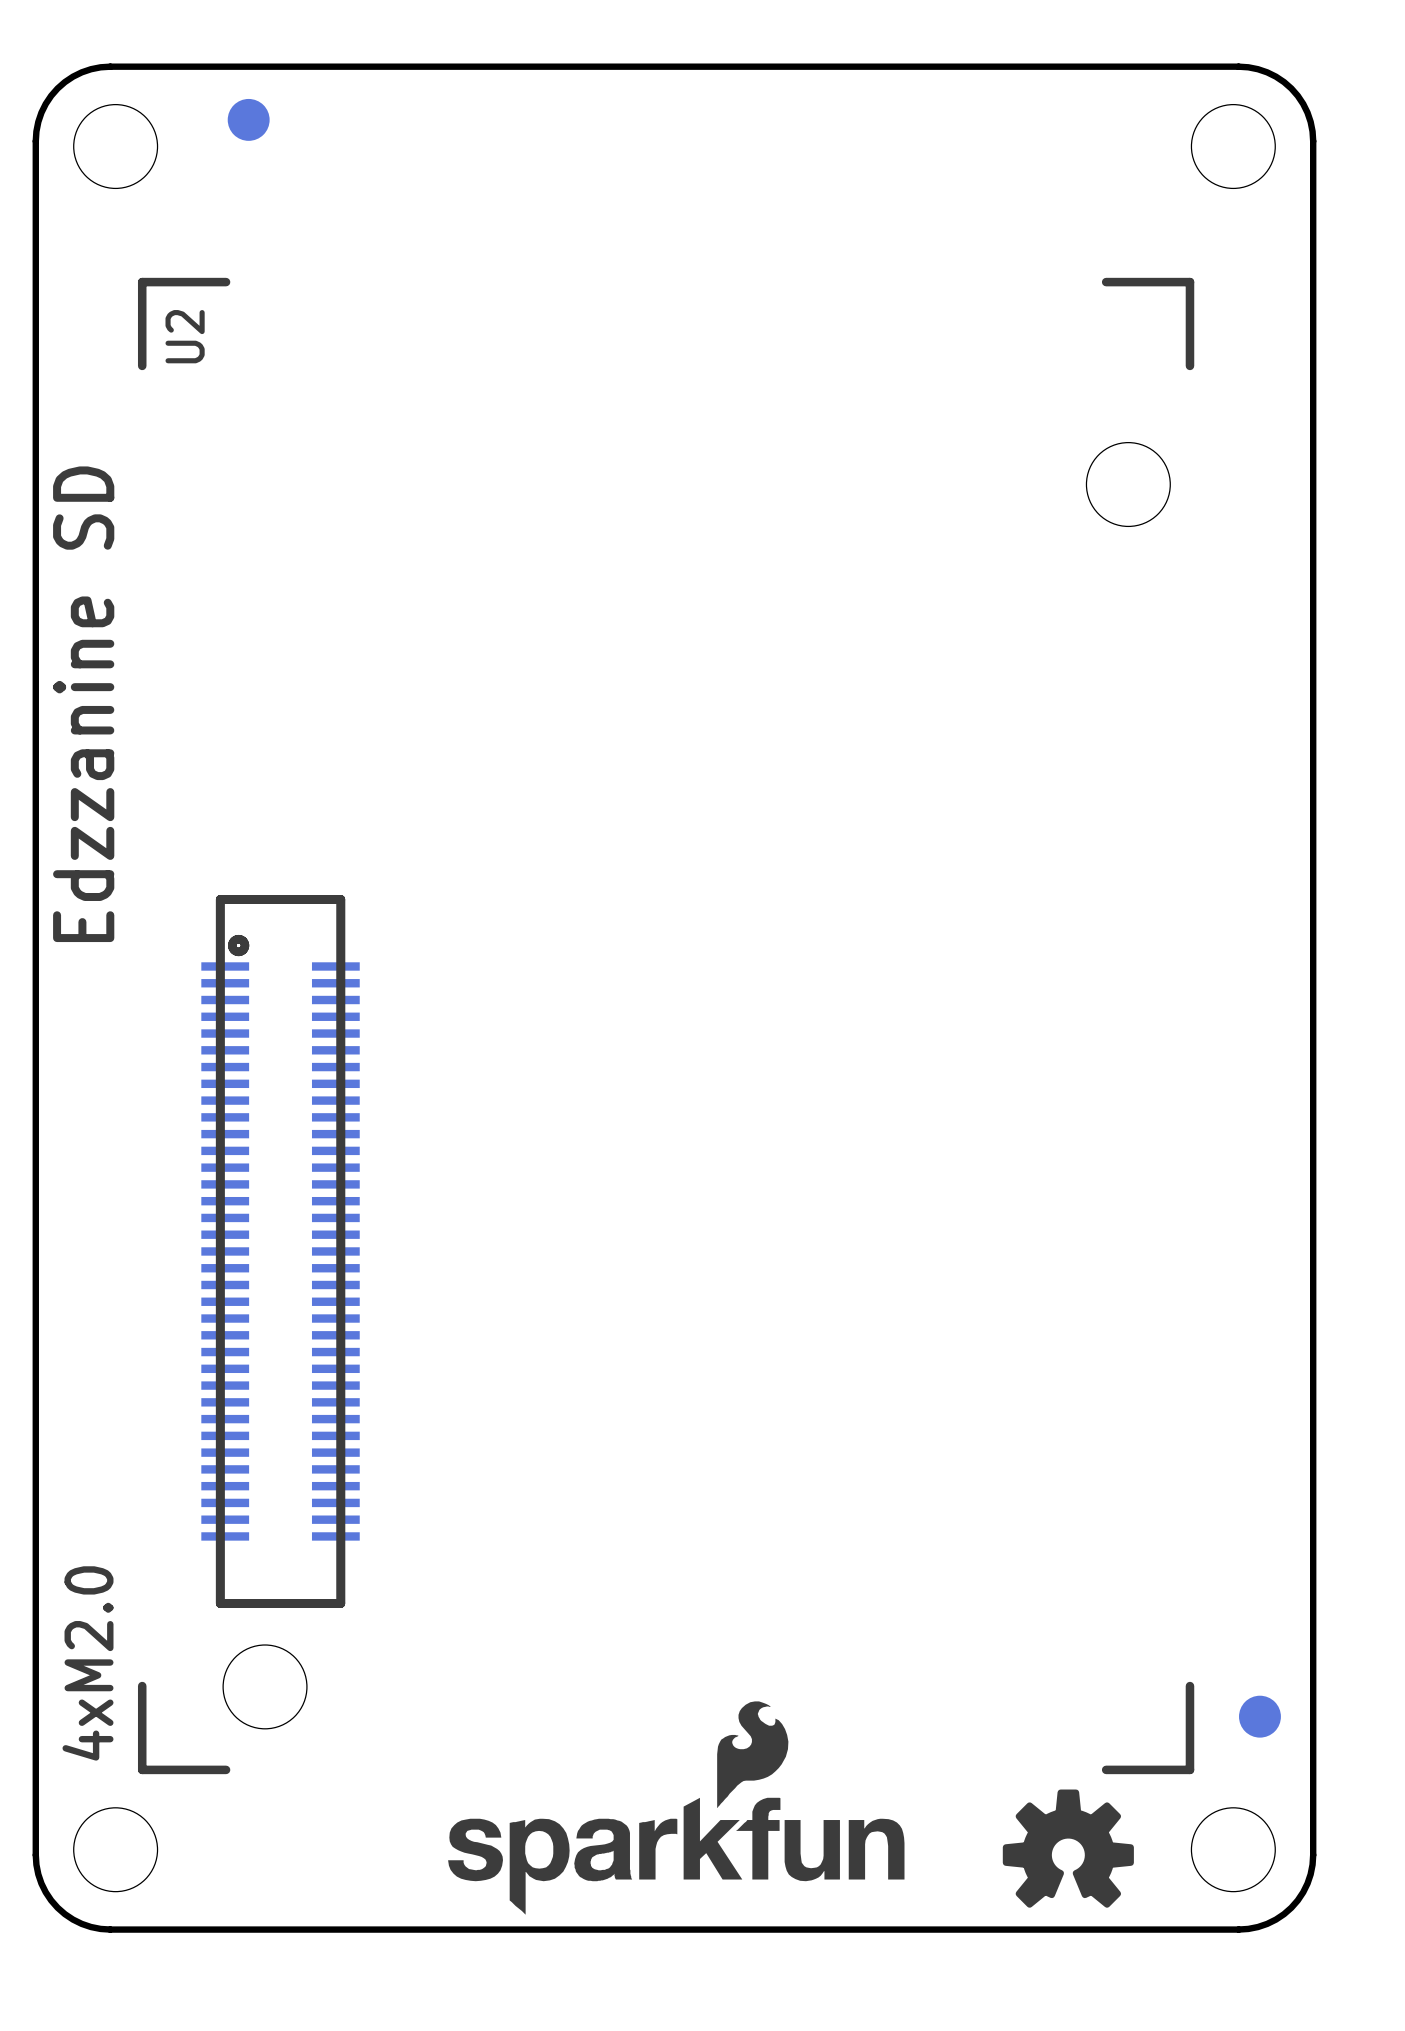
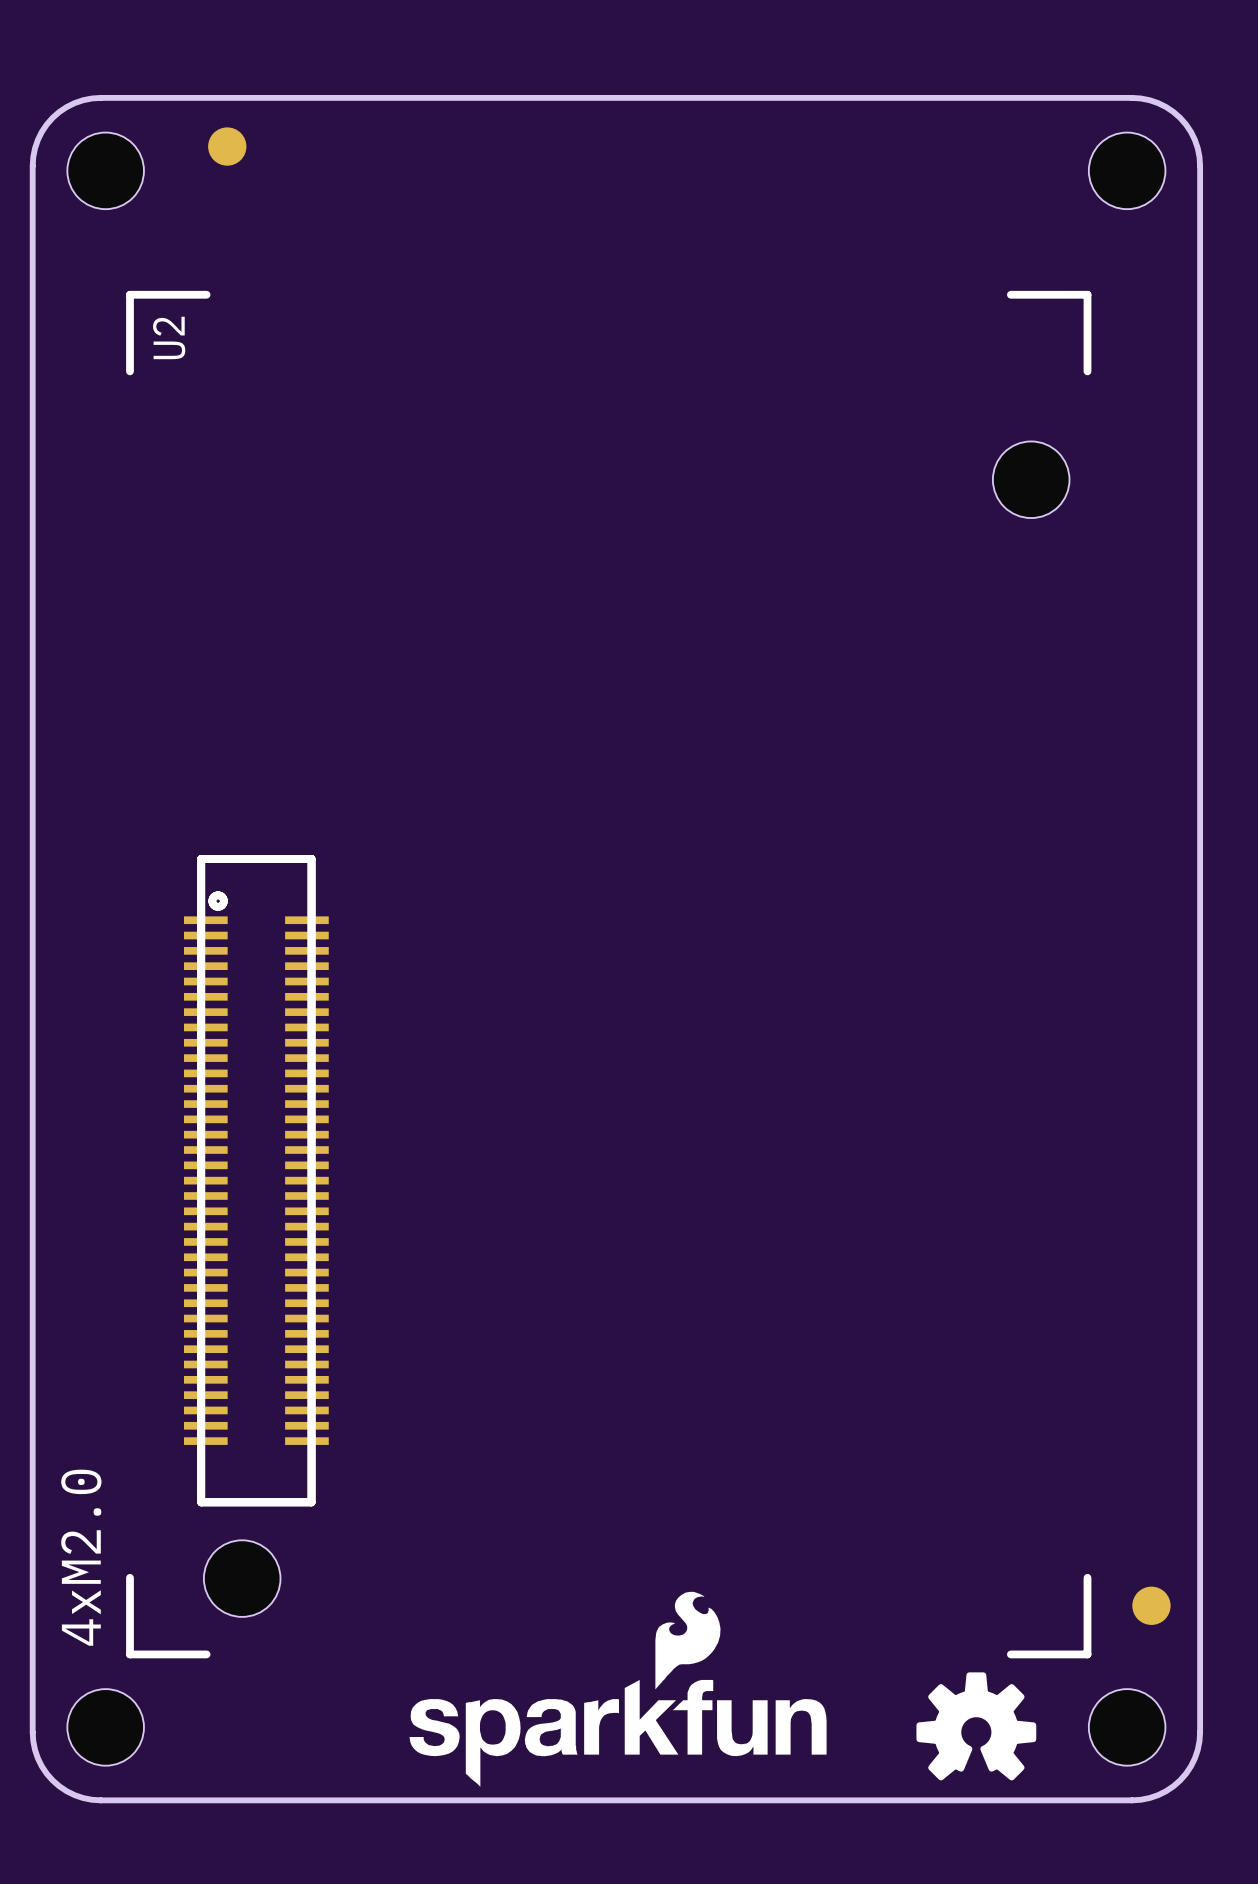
text: Edzzanine SD (83, 704) -> none

